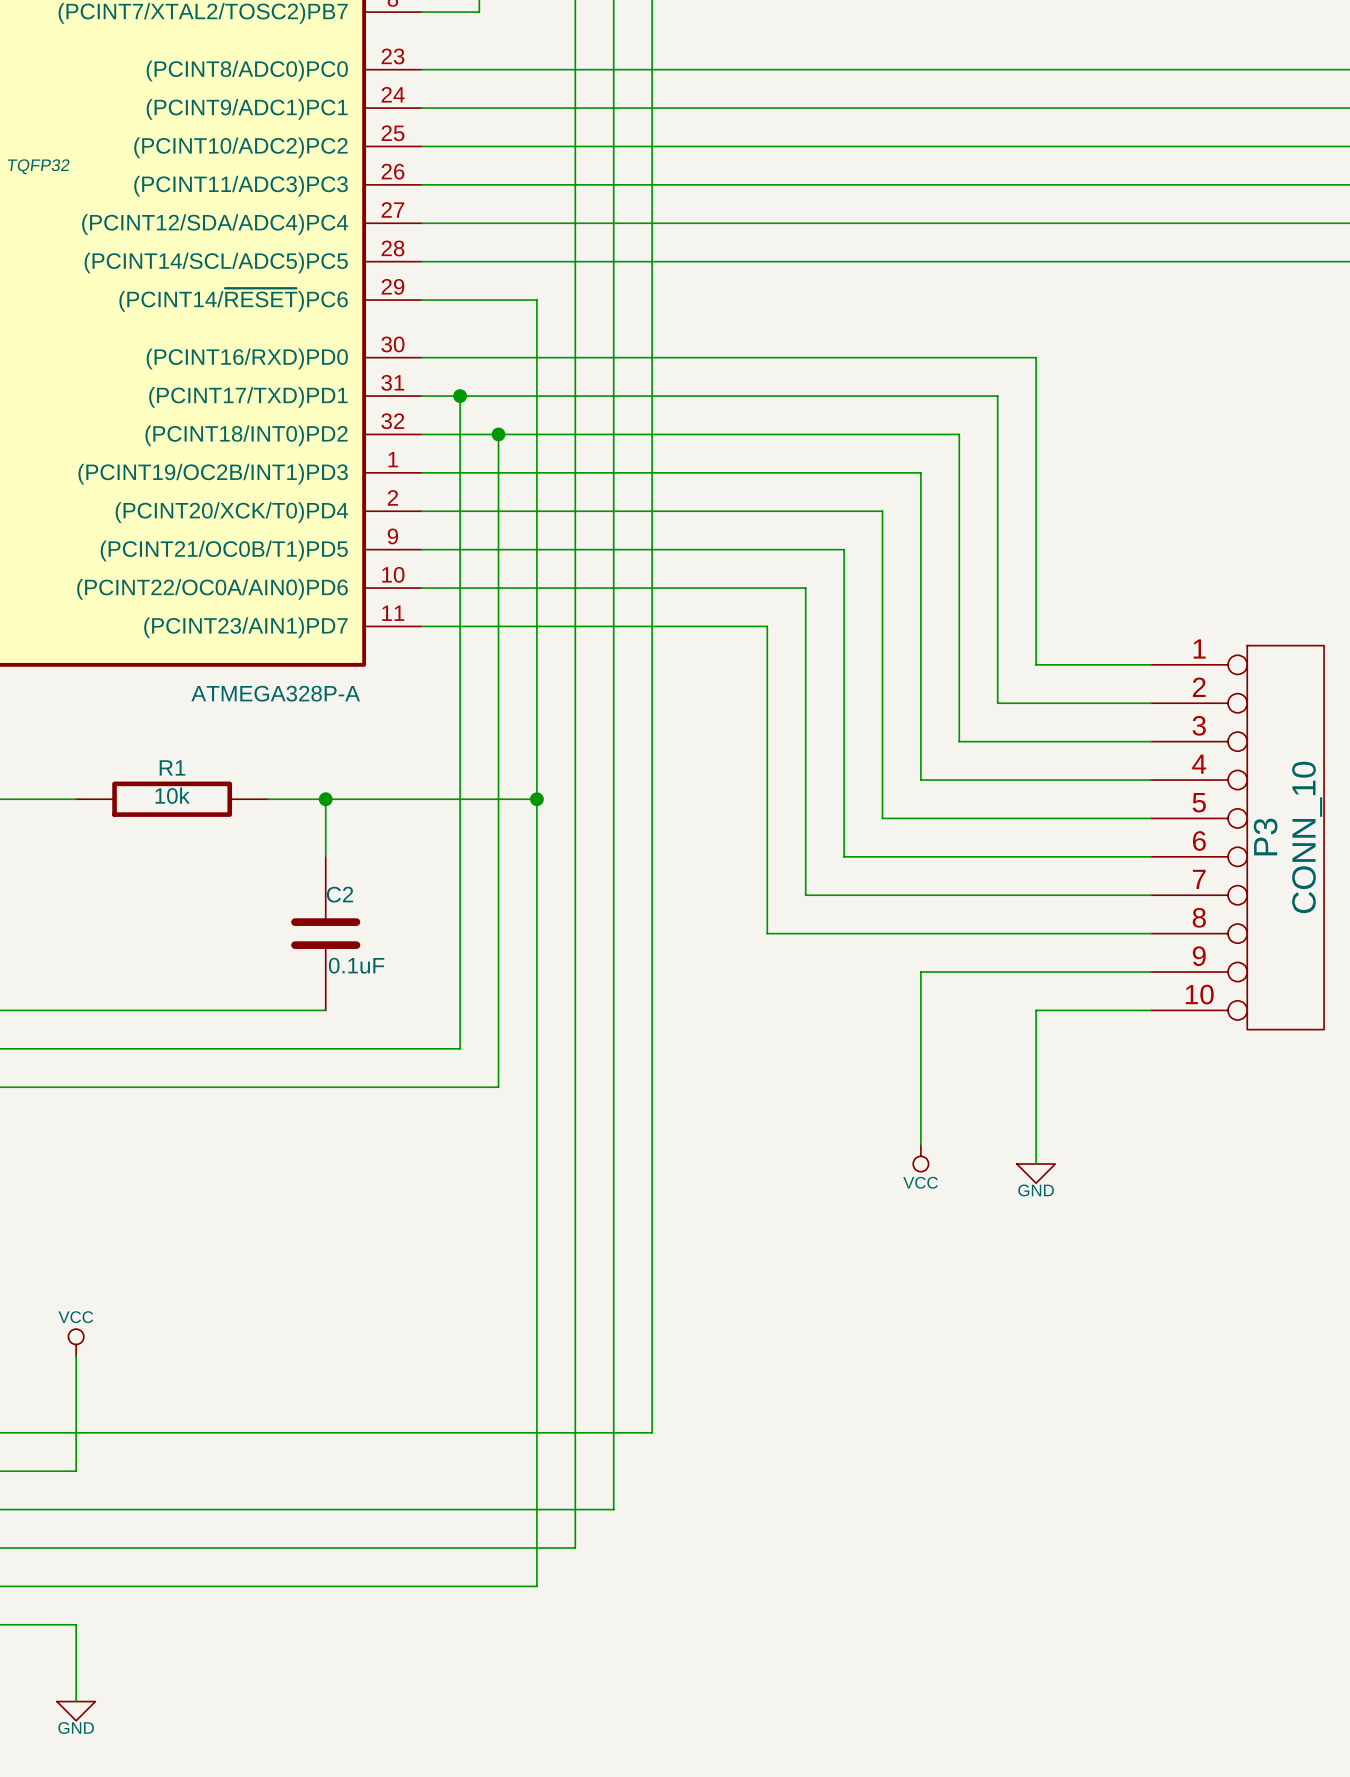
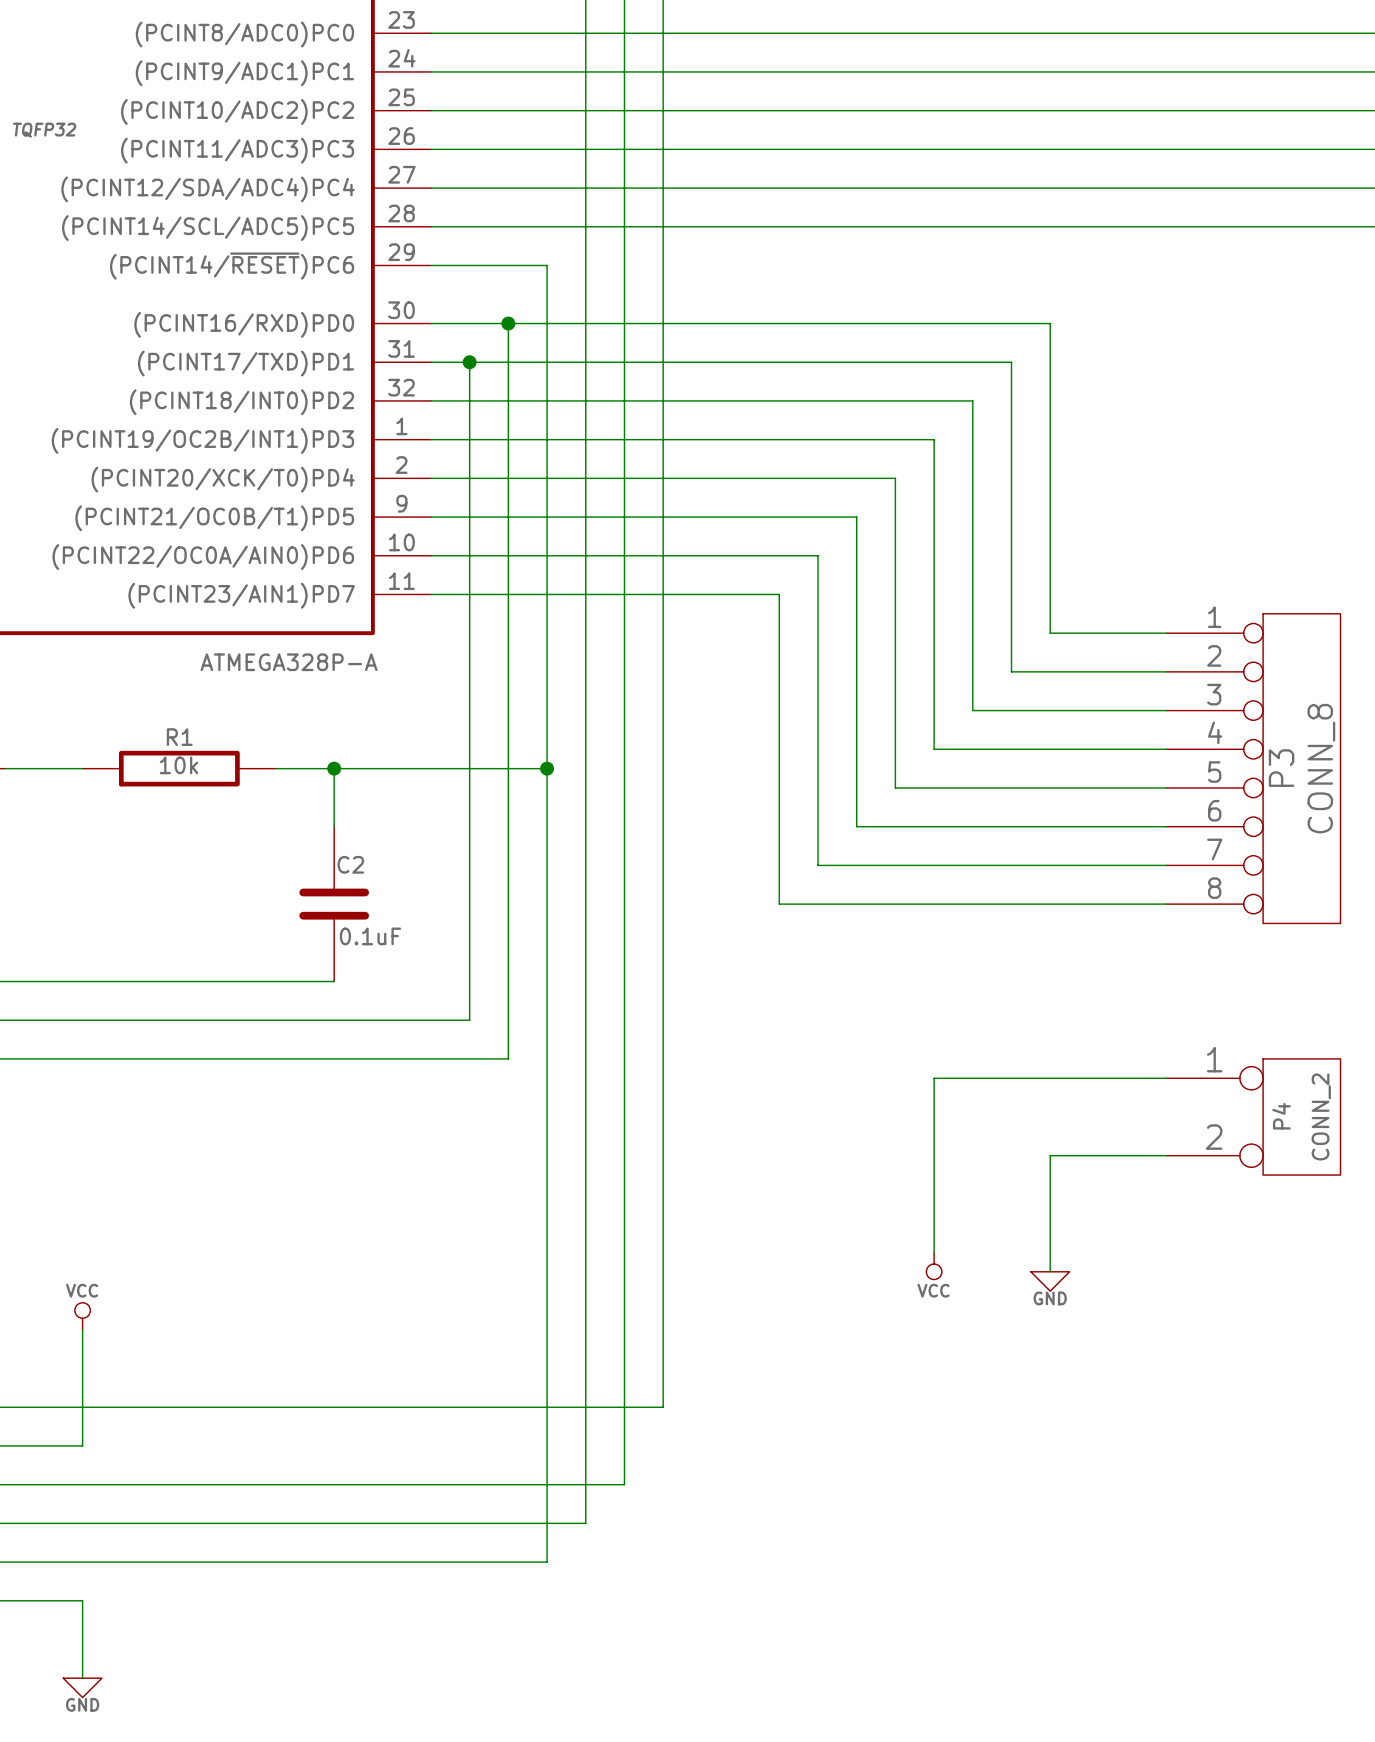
wire: none -> (508, 323) (508, 400)
junction position: (498, 434) -> (508, 323)
P3 symbol: [1151, 645, 1325, 1030] -> [1166, 613, 1341, 924]
P3 value: CONN_10 (1307, 837) -> CONN_8 (1321, 768)
wire: (1151, 972) (920, 972) (920, 1106) -> (1166, 1078) (934, 1078)
wire: (1151, 1010) (1036, 1010) (1036, 1164) -> none
wire: none -> (934, 1116) (934, 1252)
P4: none -> CONN_2 (1253, 1116)
power symbol position: VCC (920, 1158) -> VCC (934, 1265)
power symbol position: GND (1036, 1173) -> GND (1050, 1281)
wire: none -> (1166, 1155) (1050, 1155) (1050, 1271)

